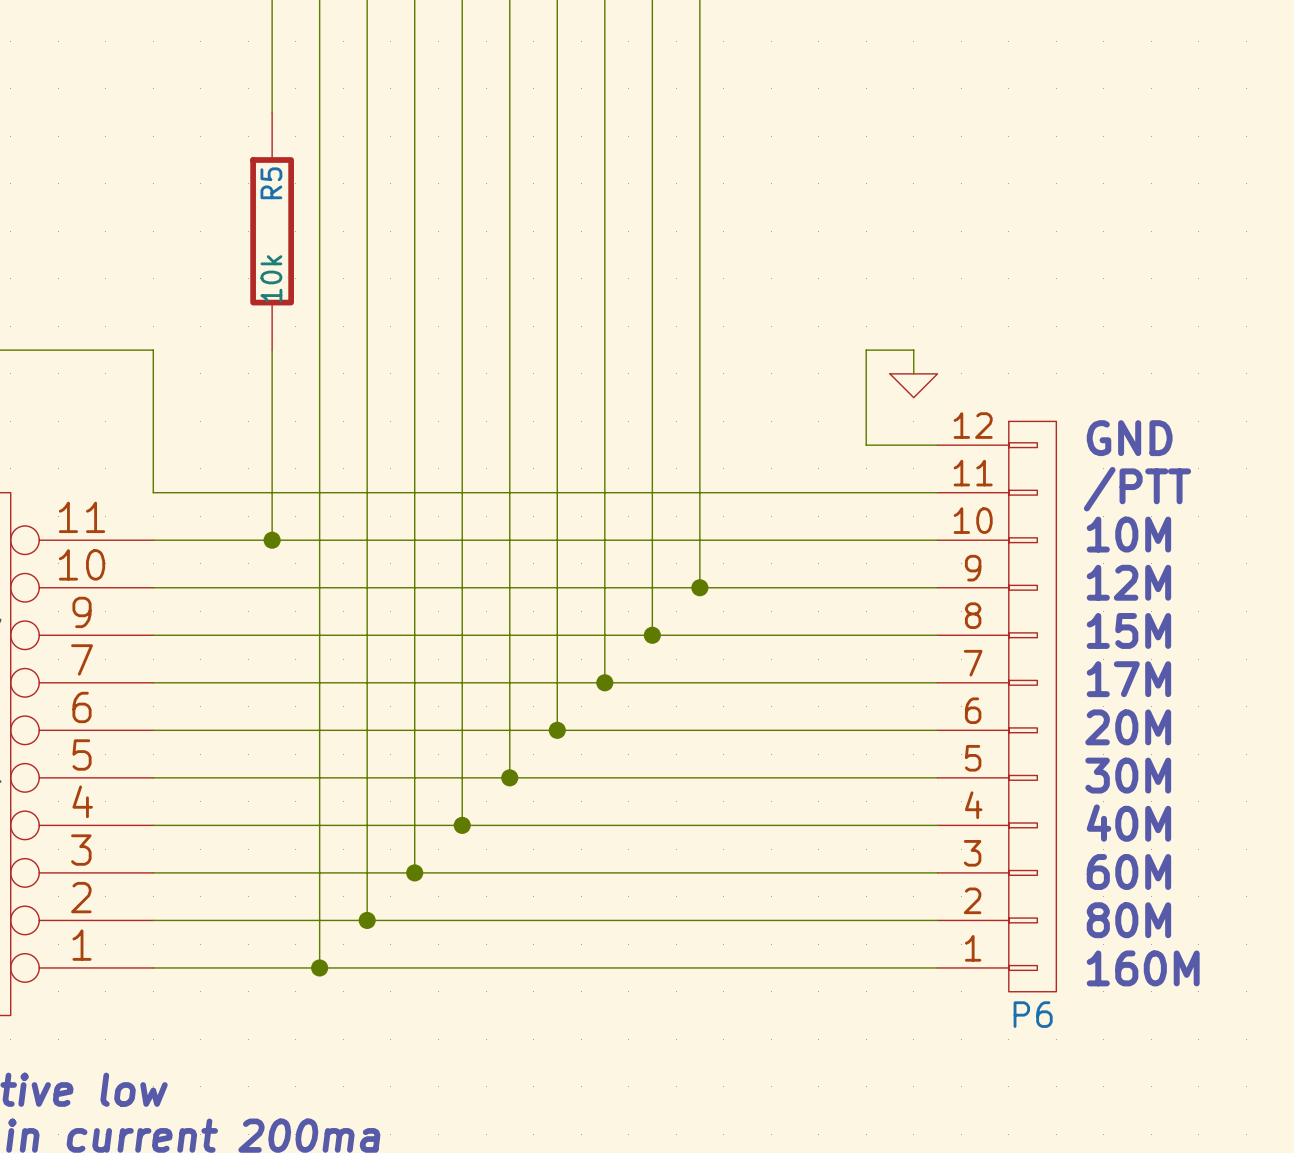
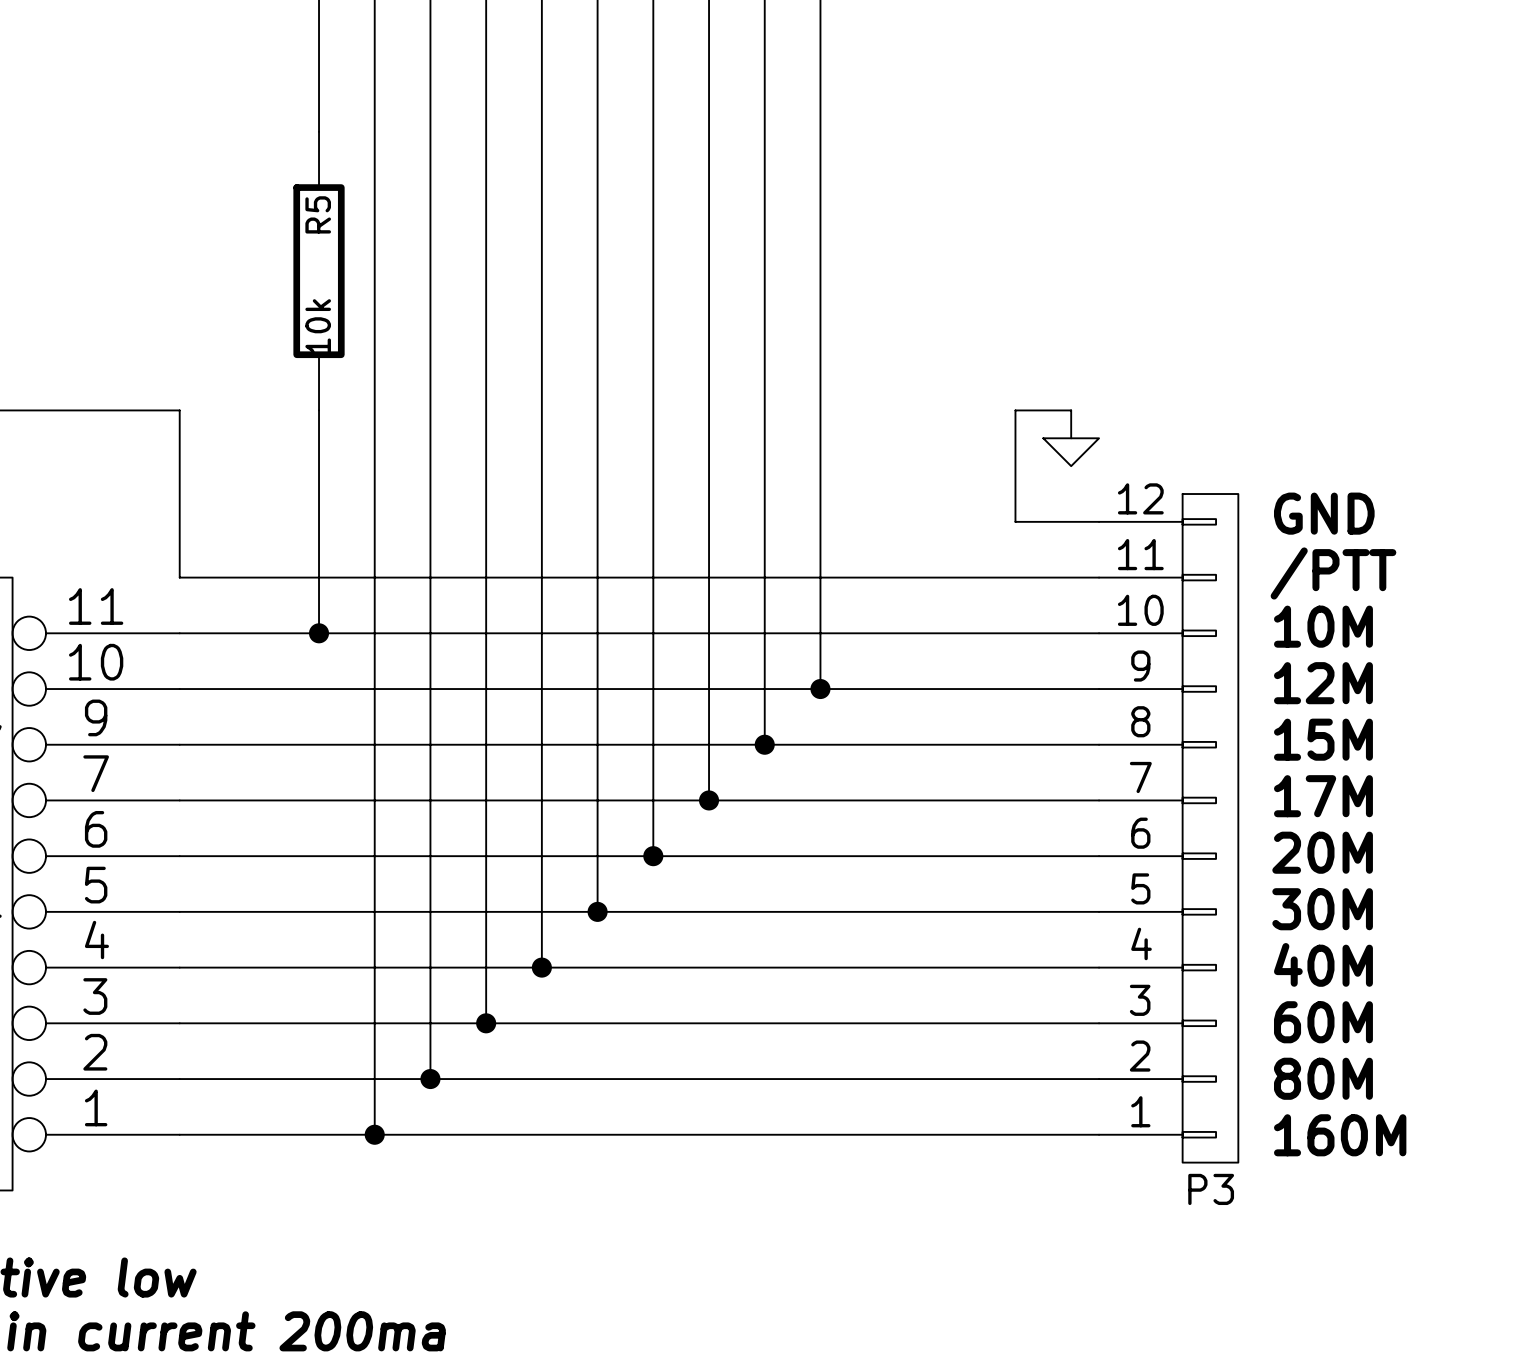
P6 name: P6 (1033, 1014) -> P3 (1211, 1189)

